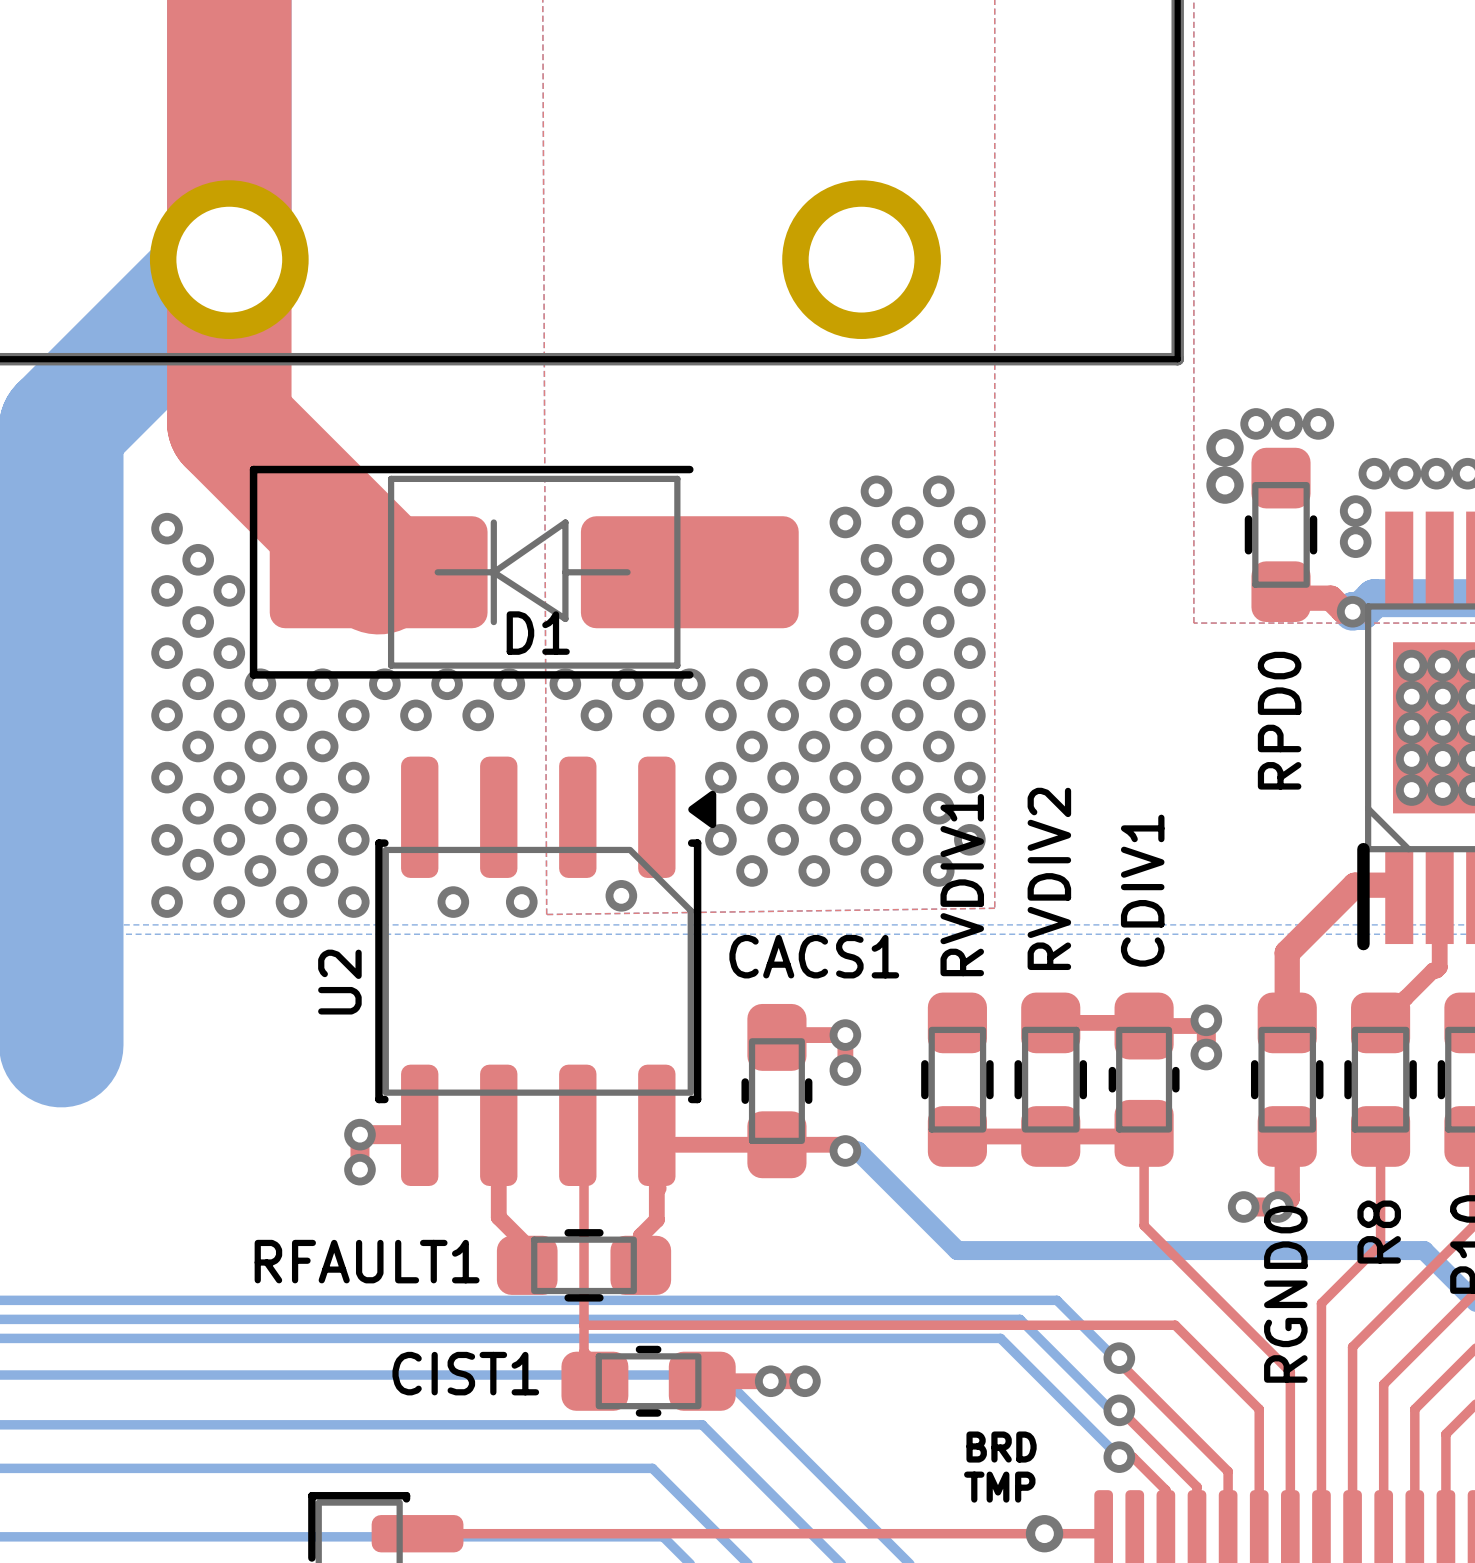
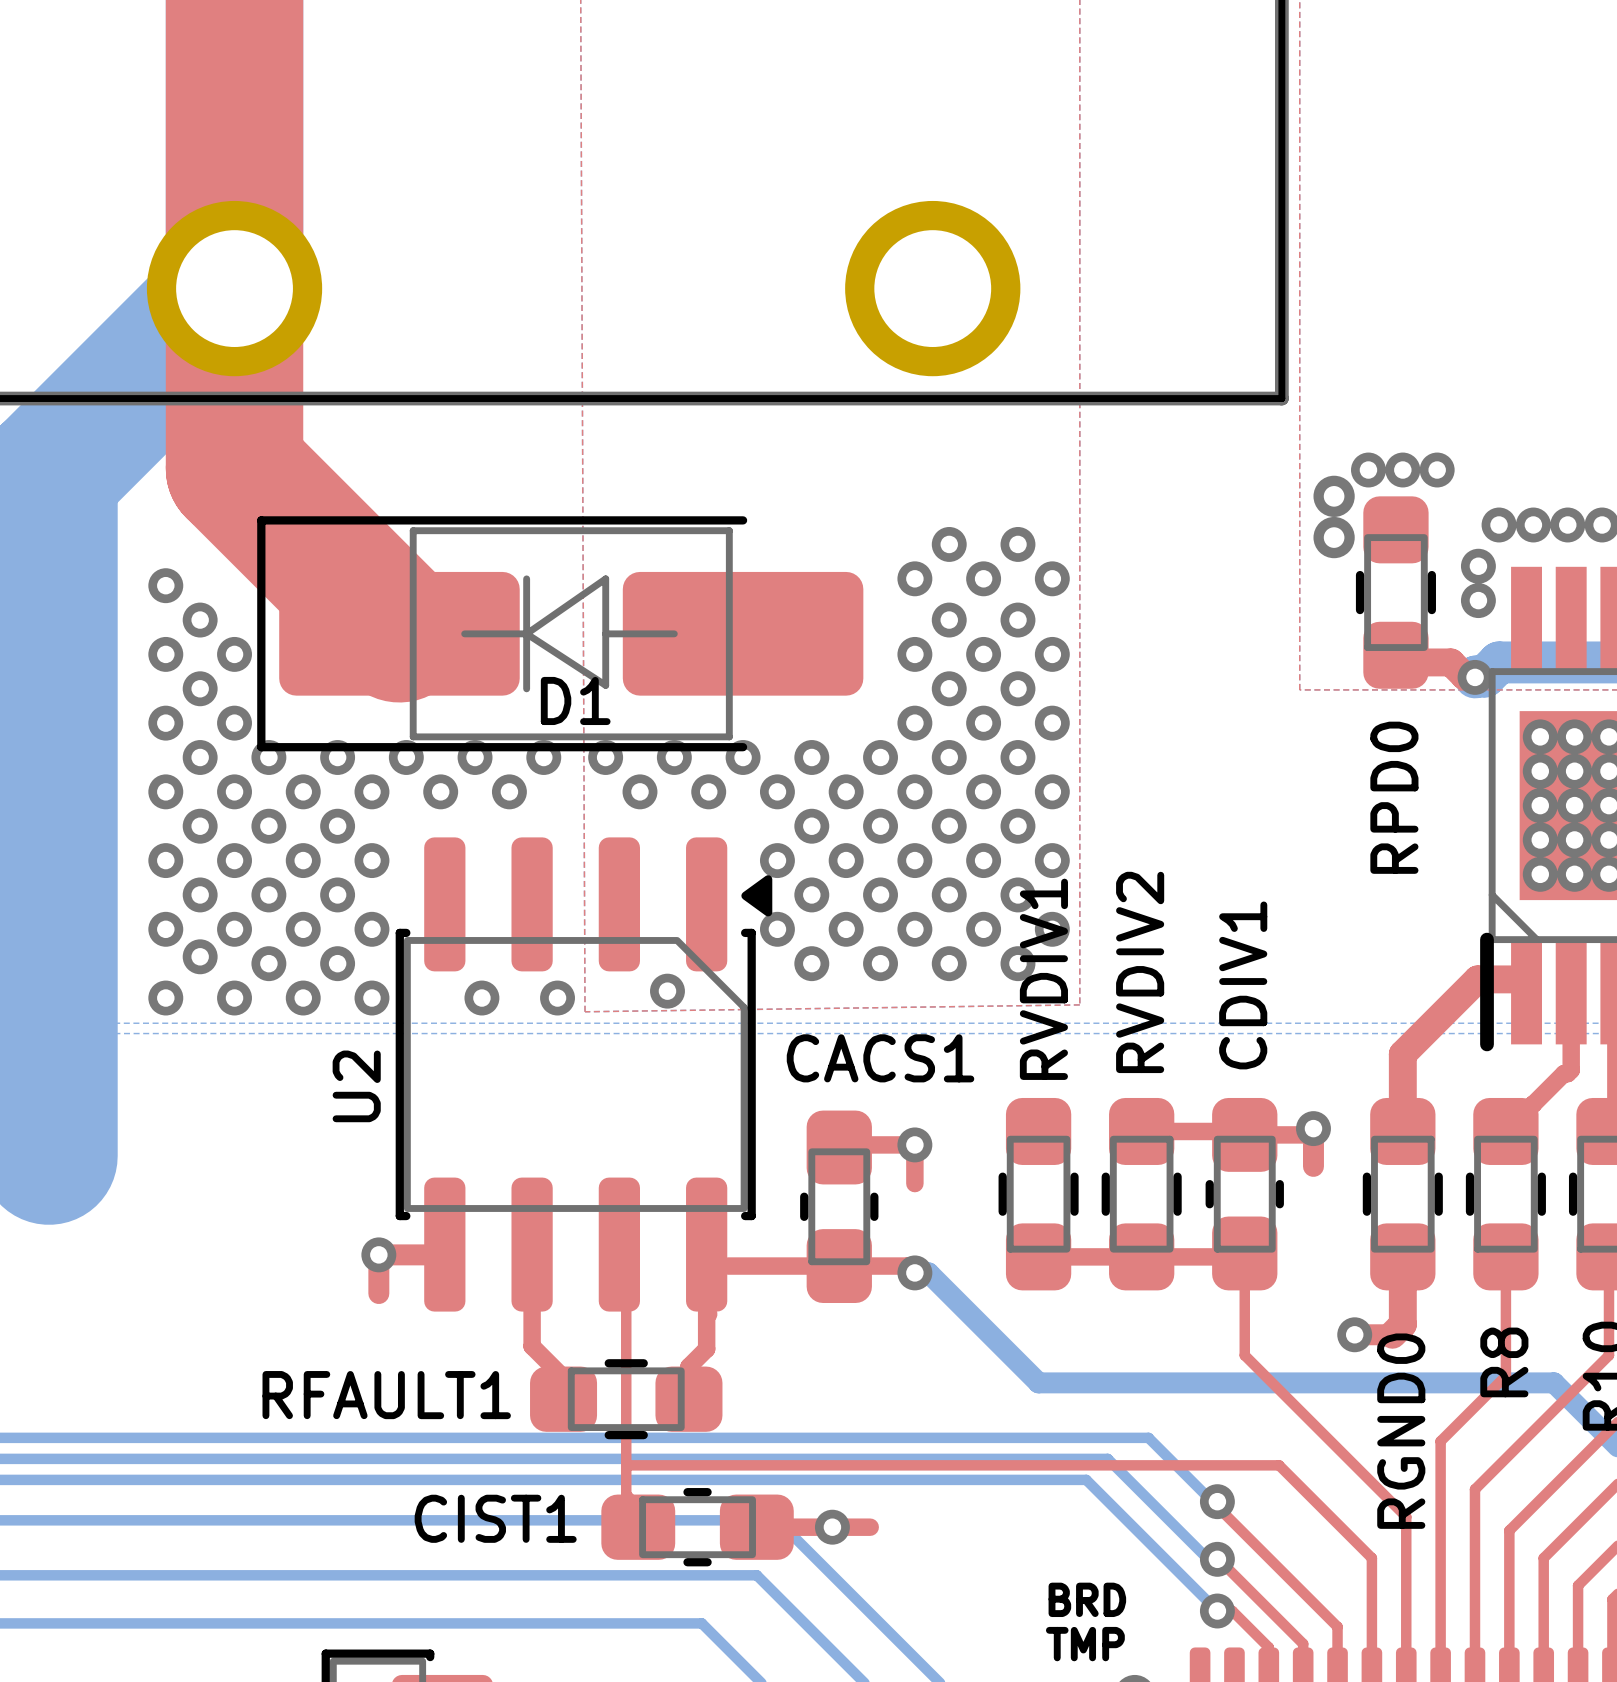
via: (1206, 1054) -> none
via: (845, 1070) -> none
via: (359, 1169) -> none
via: (1277, 1207) -> none
via: (804, 1381) -> none

